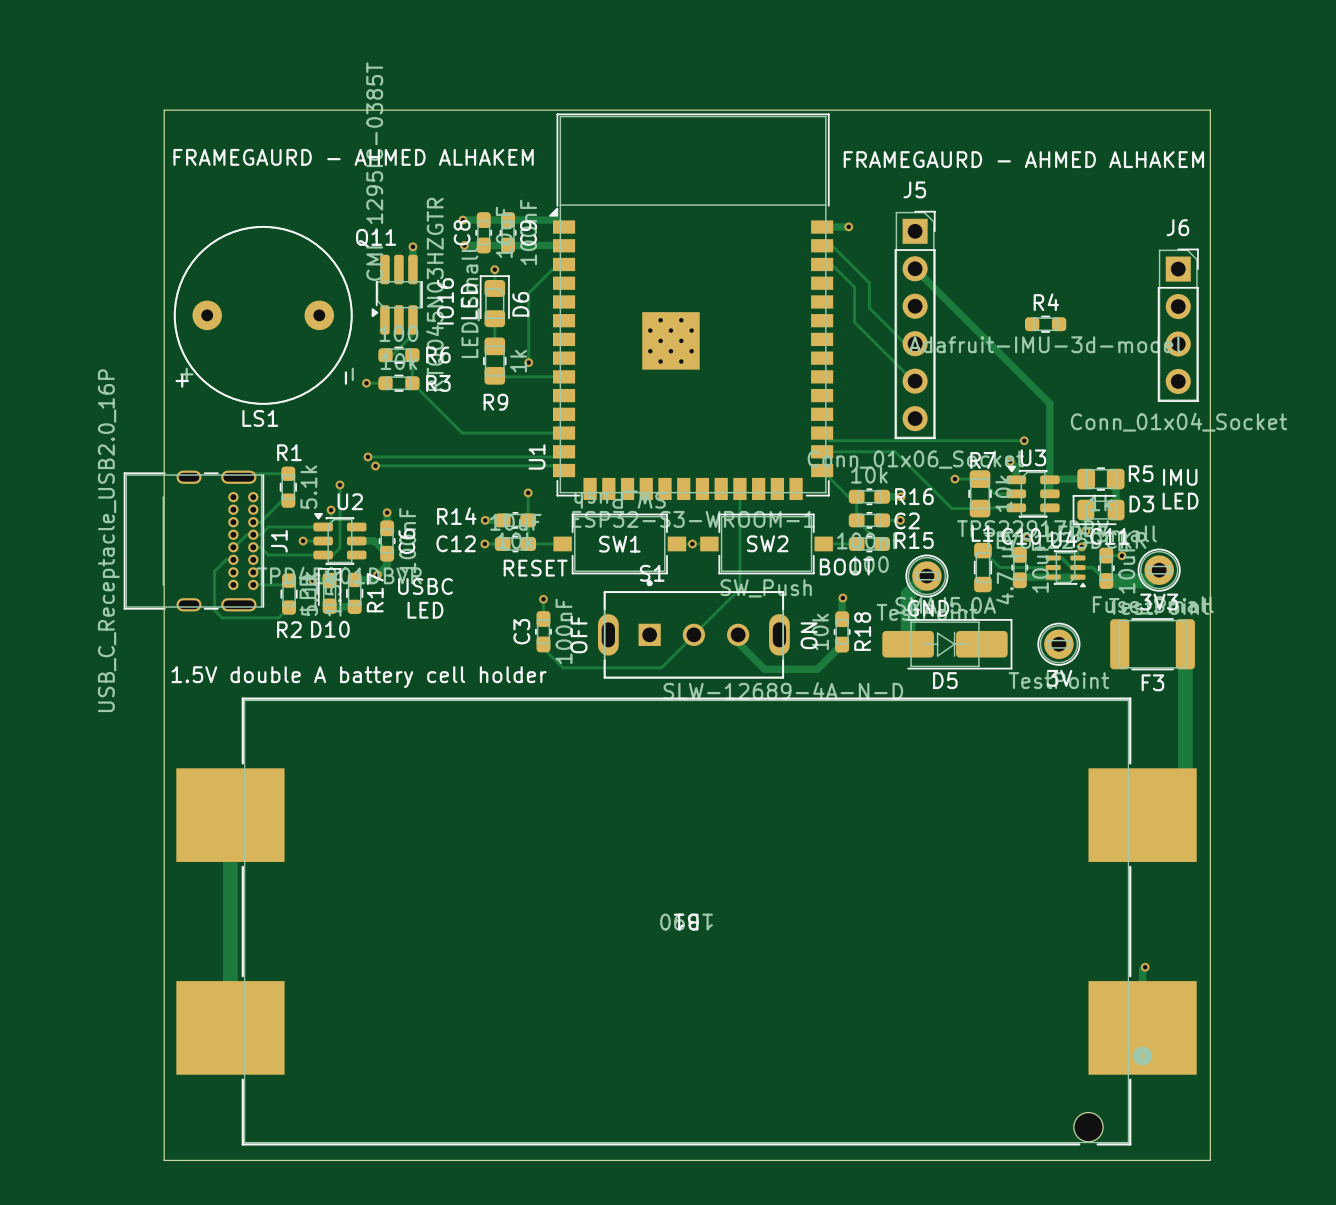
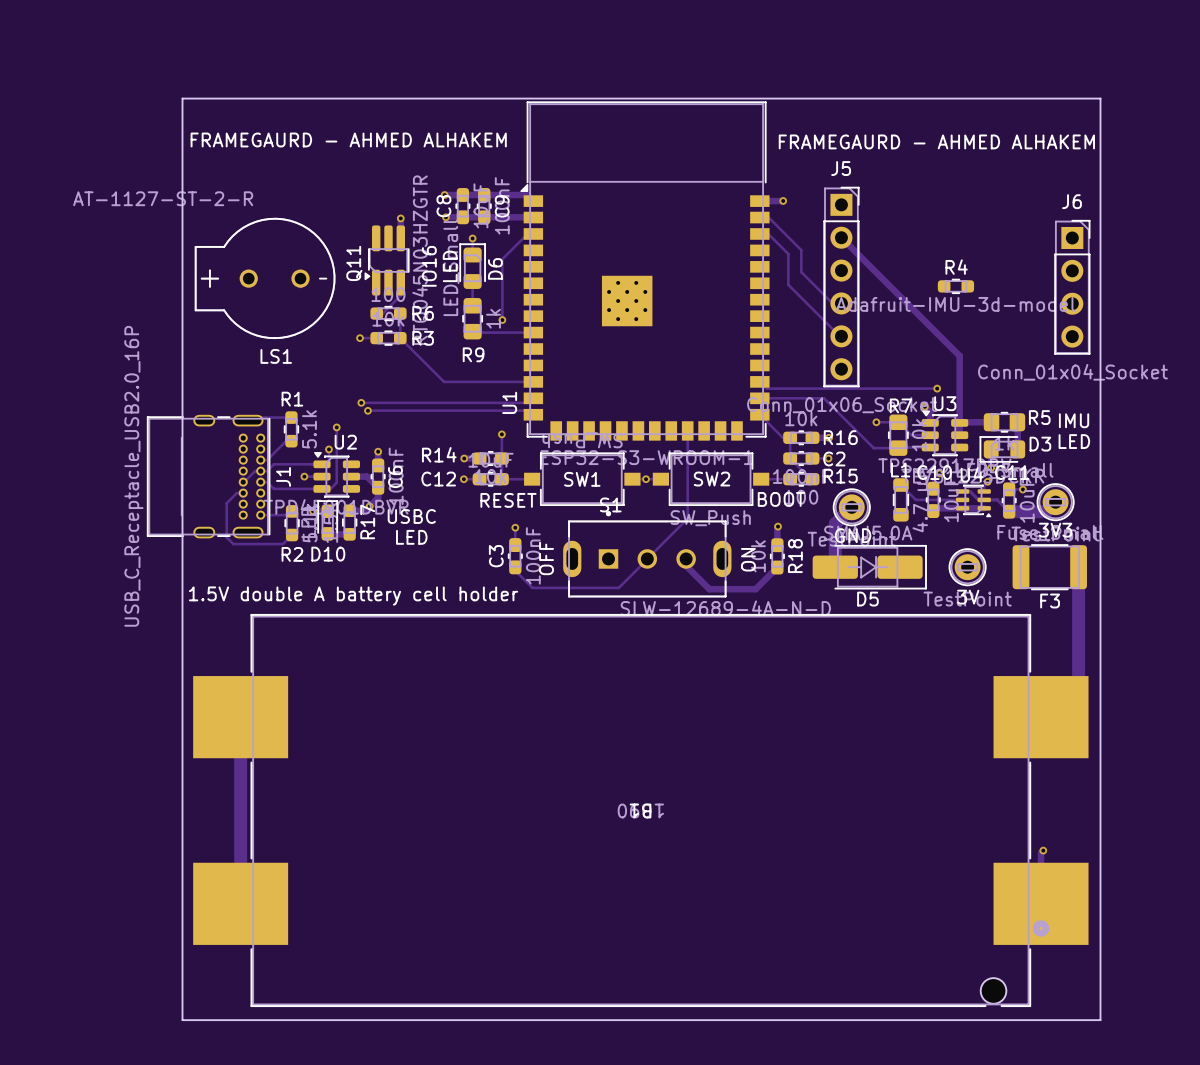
LS1 value: CMI-1295IC-0385T (374, 171) -> AT-1127-ST-2-R (163, 198)
LS1 footprint: [173, 225, 353, 405] -> [194, 217, 336, 339]
Q11 name rotation: 0° (376, 238) -> 90° counterclockwise (354, 263)
Q11 name position: Q11 (376, 238) -> Q11 (354, 263)

